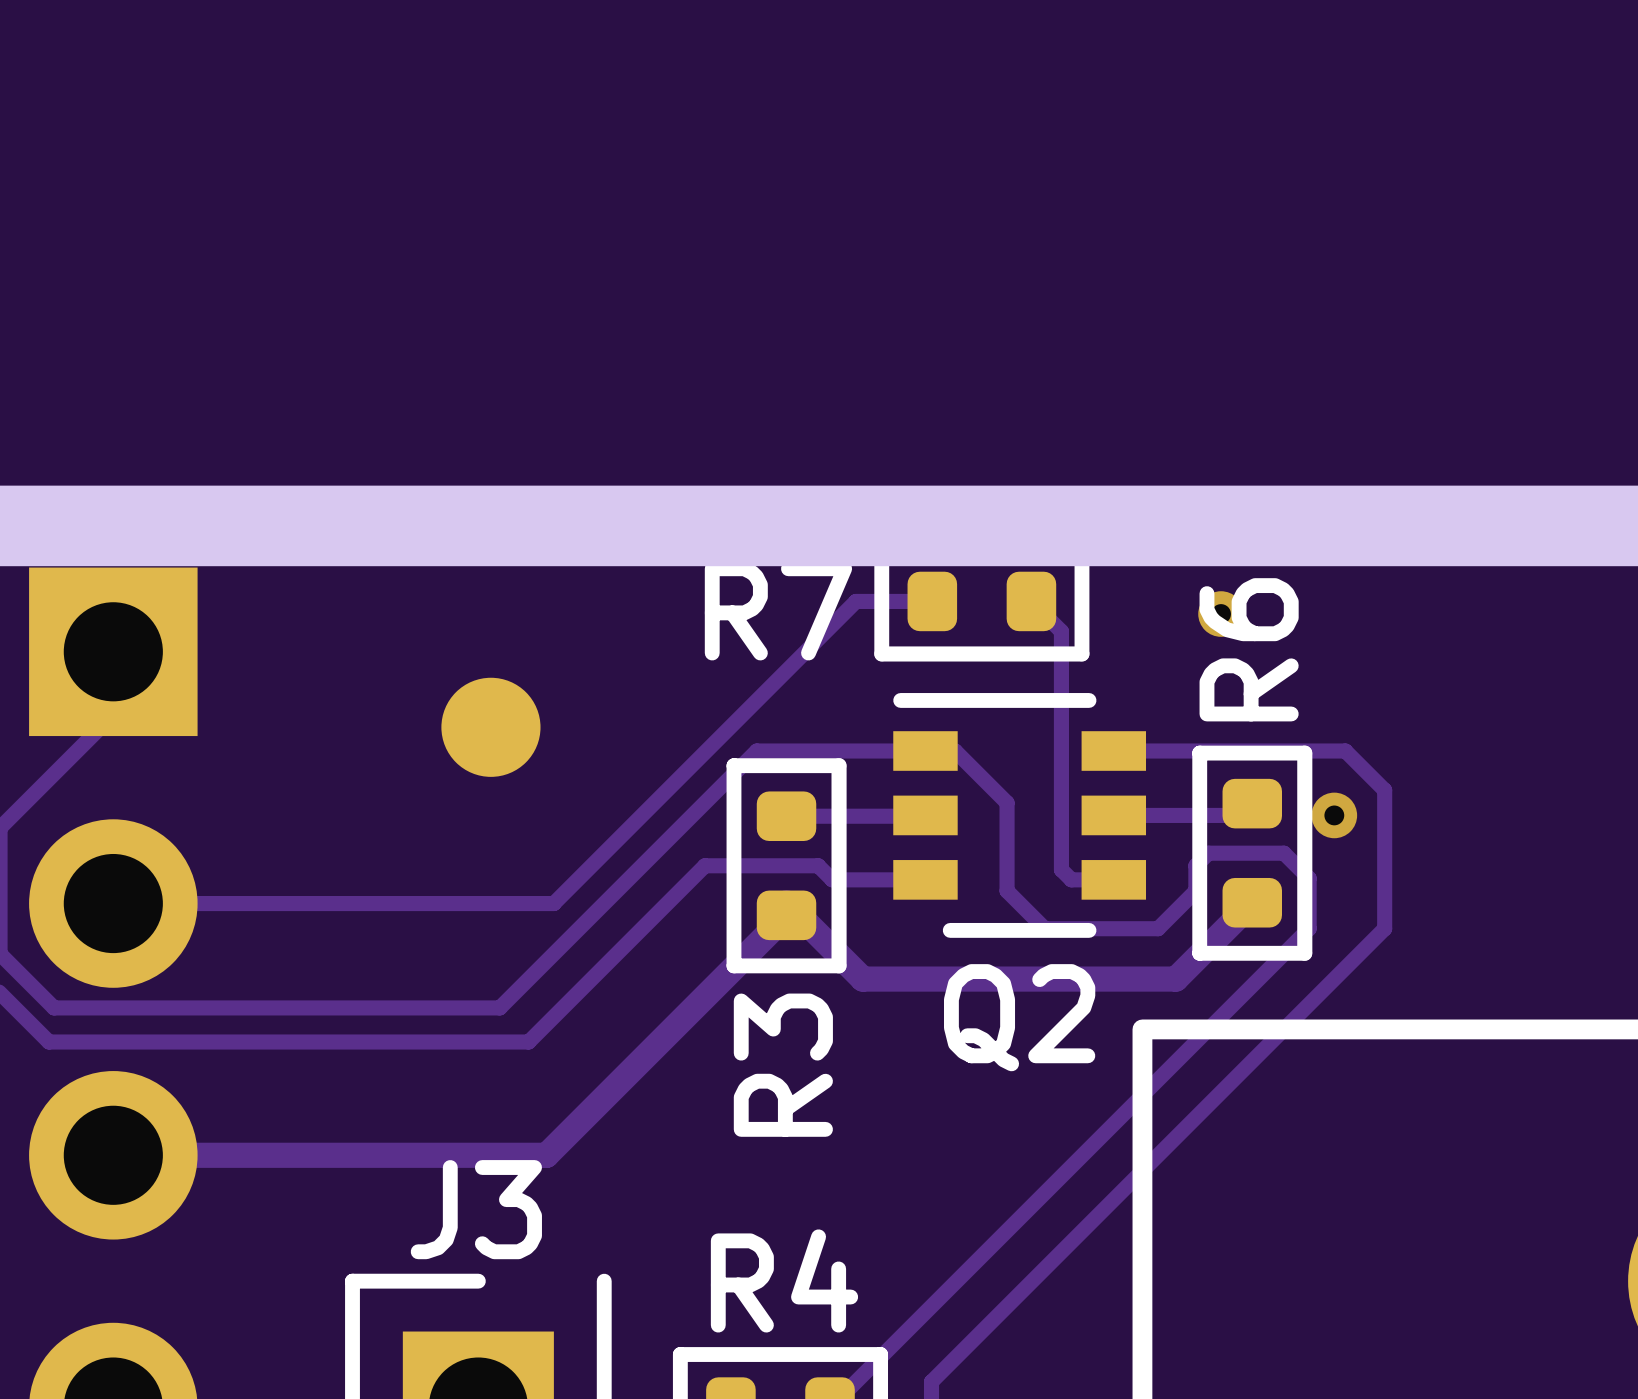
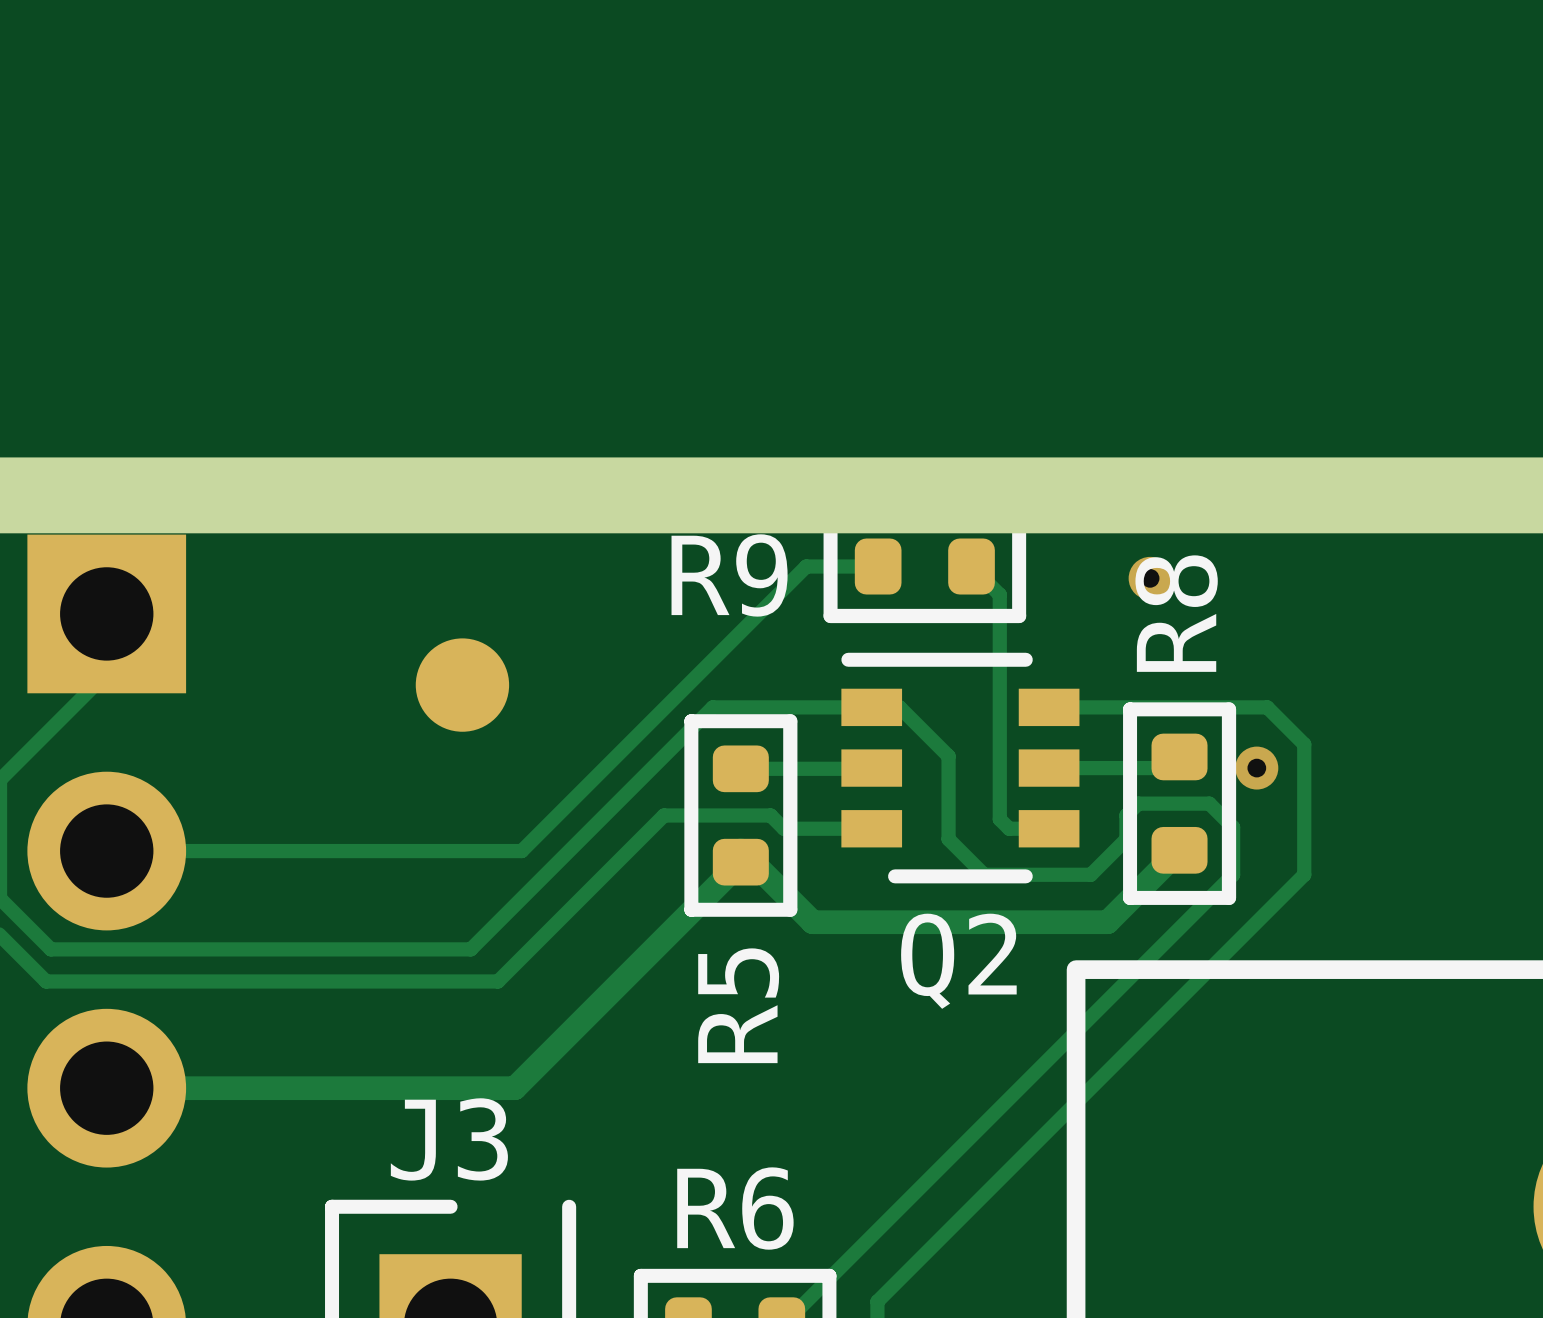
R7 name: R7 (778, 610) -> R9 (729, 575)
R6 name: R6 (1249, 649) -> R8 (1176, 613)
R3 name: R3 (783, 1065) -> R5 (738, 1005)
R4 name: R4 (784, 1280) -> R6 (735, 1208)

